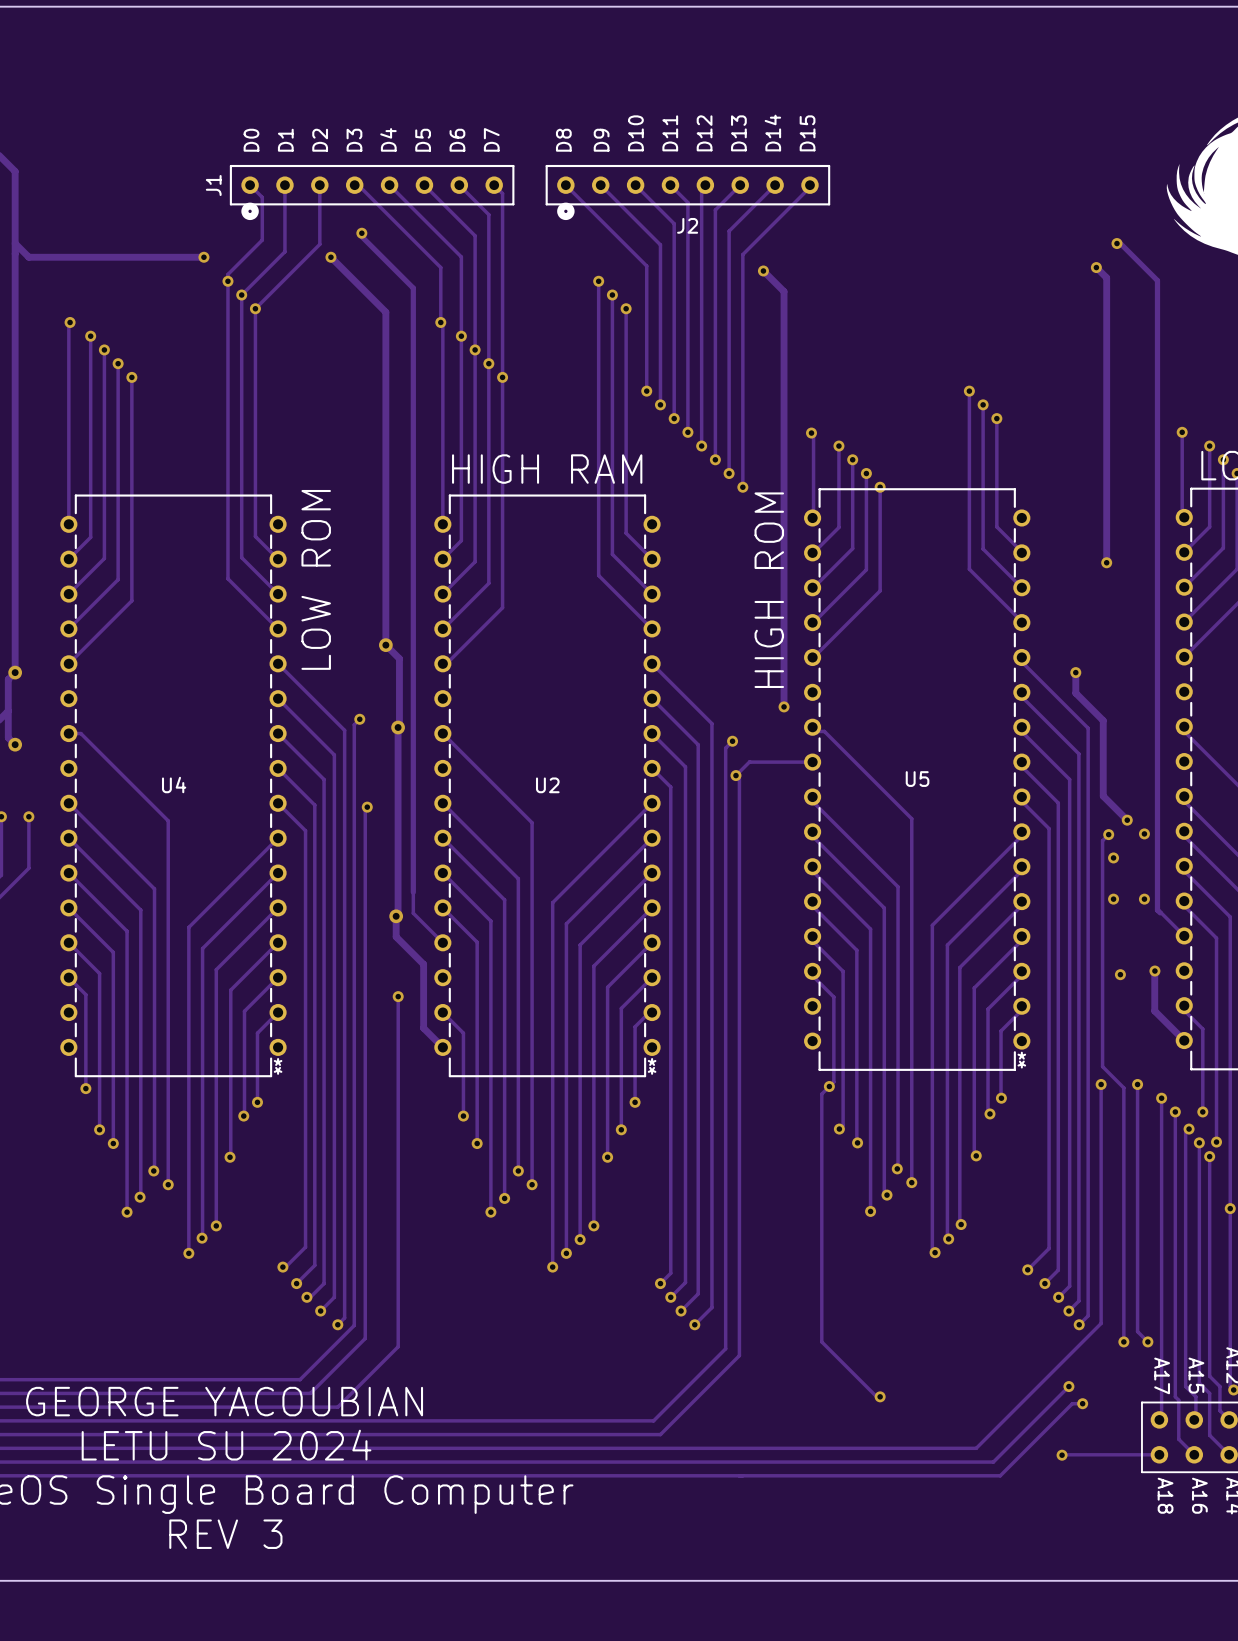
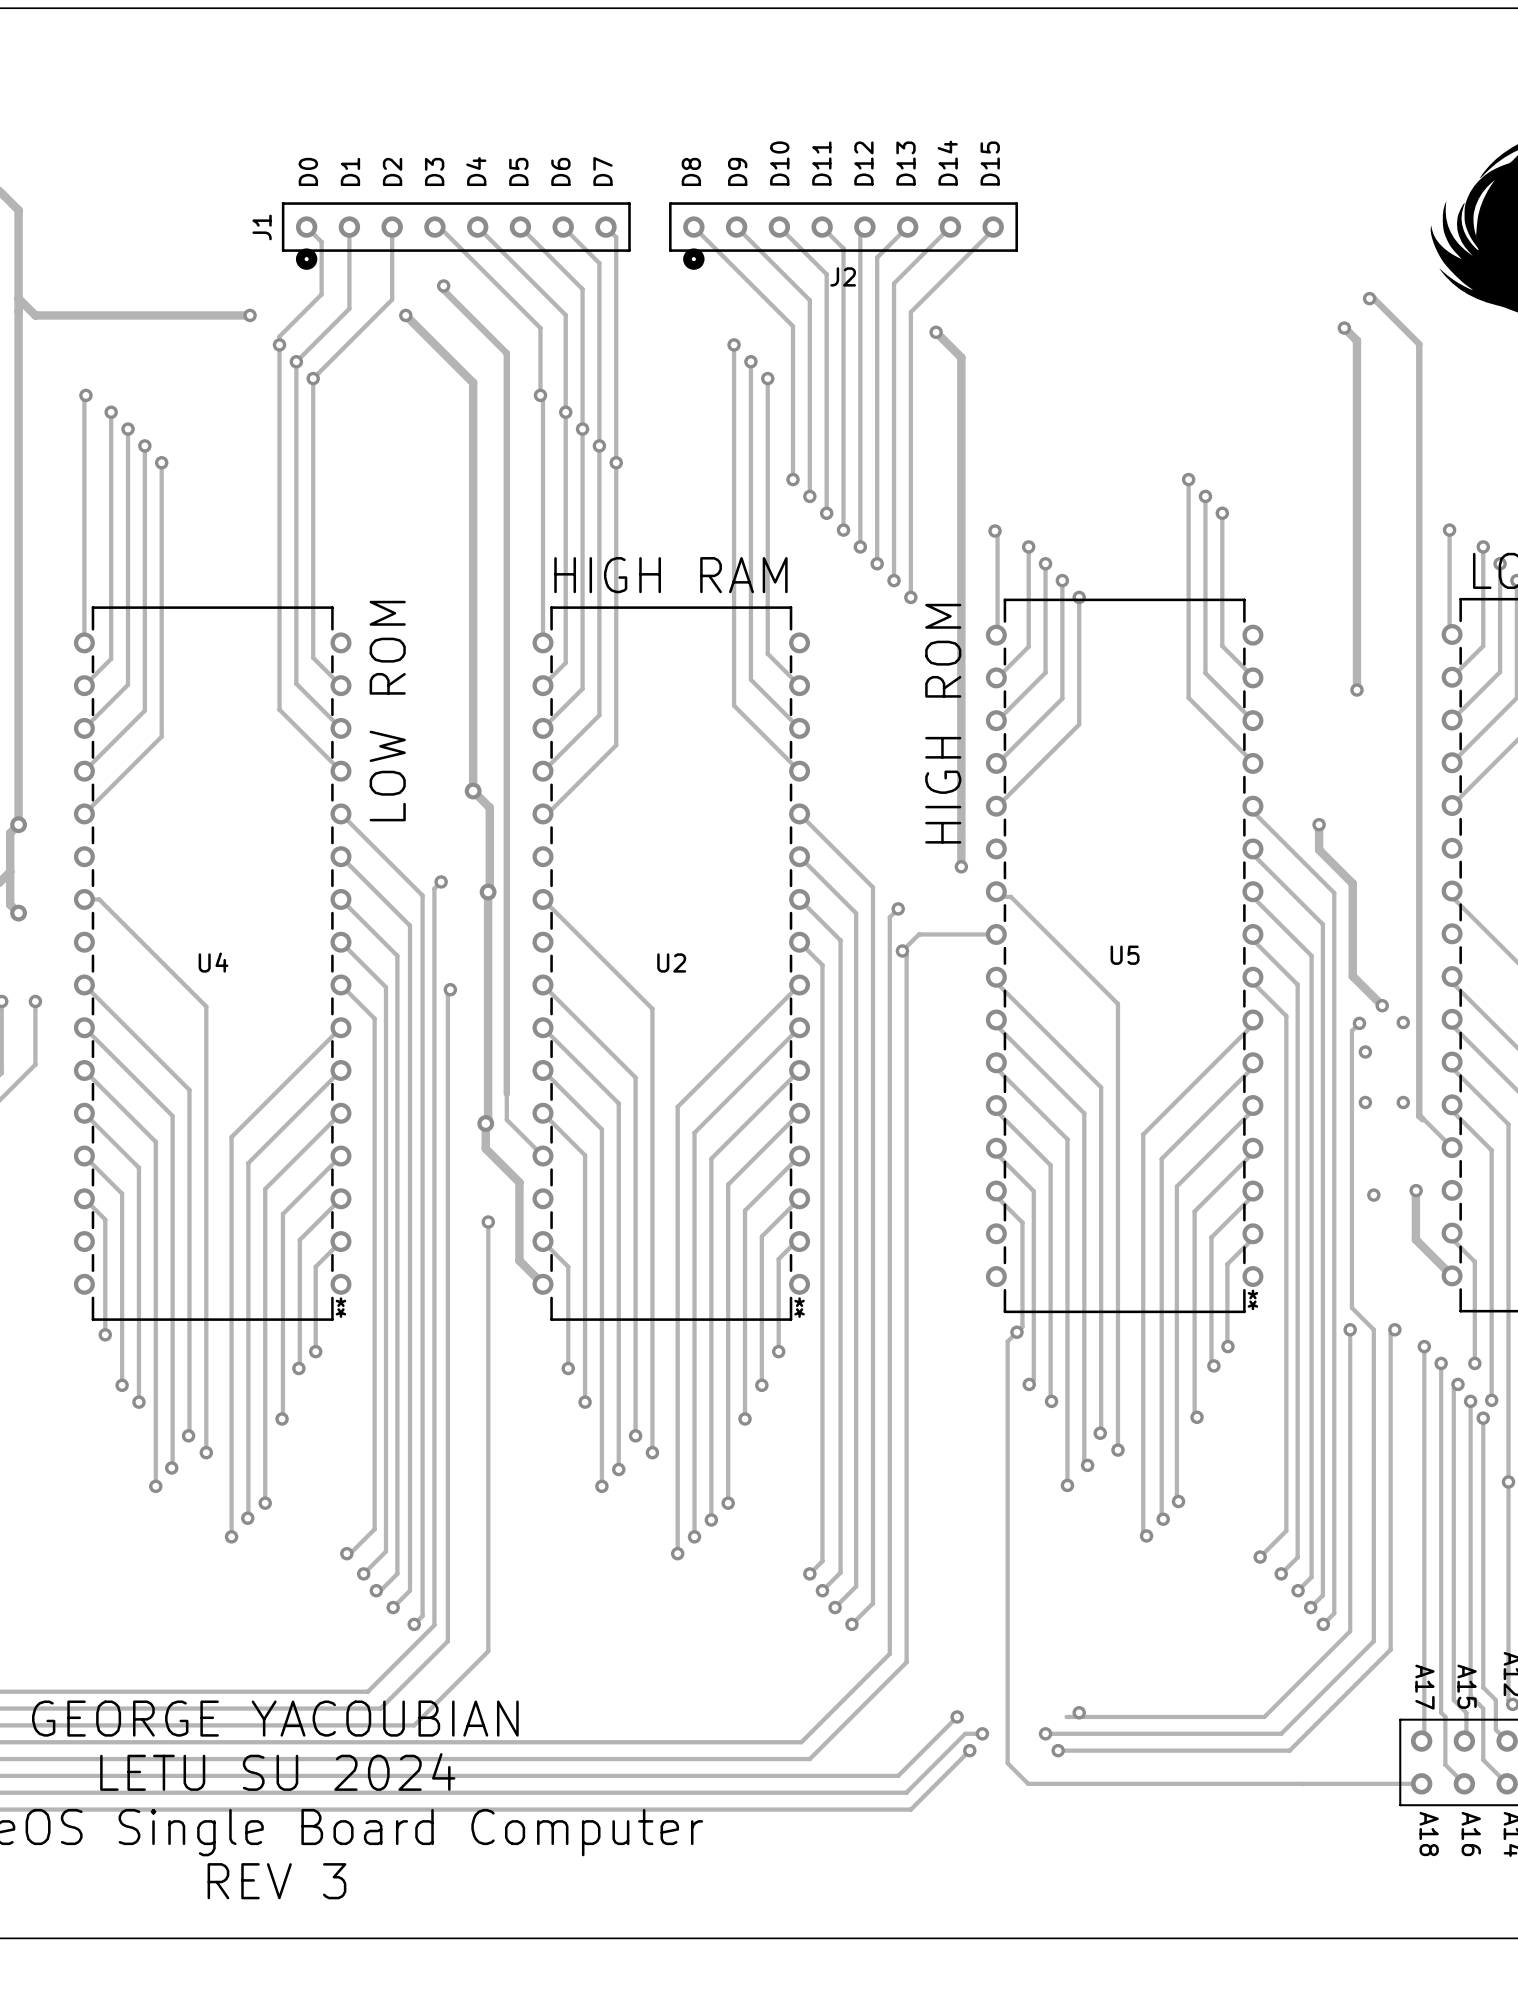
track: (1120, 1084) (1123, 1087) (1123, 1341) -> (1373, 1329) (1373, 1641) (1281, 1733) (1045, 1733)
track: (1137, 1084) (1137, 1331) (1147, 1341) -> (1394, 1329) (1390, 1333) (1390, 1649) (1289, 1750) (1058, 1750)
track: (1101, 1323) (976, 1448) (732, 1448) -> (1350, 1622) (1350, 1631) (1264, 1716) (1066, 1716)
track: (821, 1341) (876, 1396) (880, 1396) -> (1007, 1645) (1007, 1763) (1028, 1783) (1302, 1783)
via: (1123, 1341) -> none
via: (1147, 1341) -> none
track: (1068, 1386) (993, 1462) (739, 1462) -> (982, 1733) (965, 1733) (906, 1792)
via: (1068, 1386) -> none
track: none -> (957, 1716) (898, 1775)
via: none -> (957, 1716)
track: (1082, 1403) (1072, 1403) (1000, 1475) (742, 1475) -> (969, 1750) (910, 1809)
via: (1082, 1403) -> none
via: none -> (982, 1733)
via: none -> (1045, 1733)
via: none -> (969, 1750)
via: none -> (1058, 1750)
via: (1062, 1455) -> none

